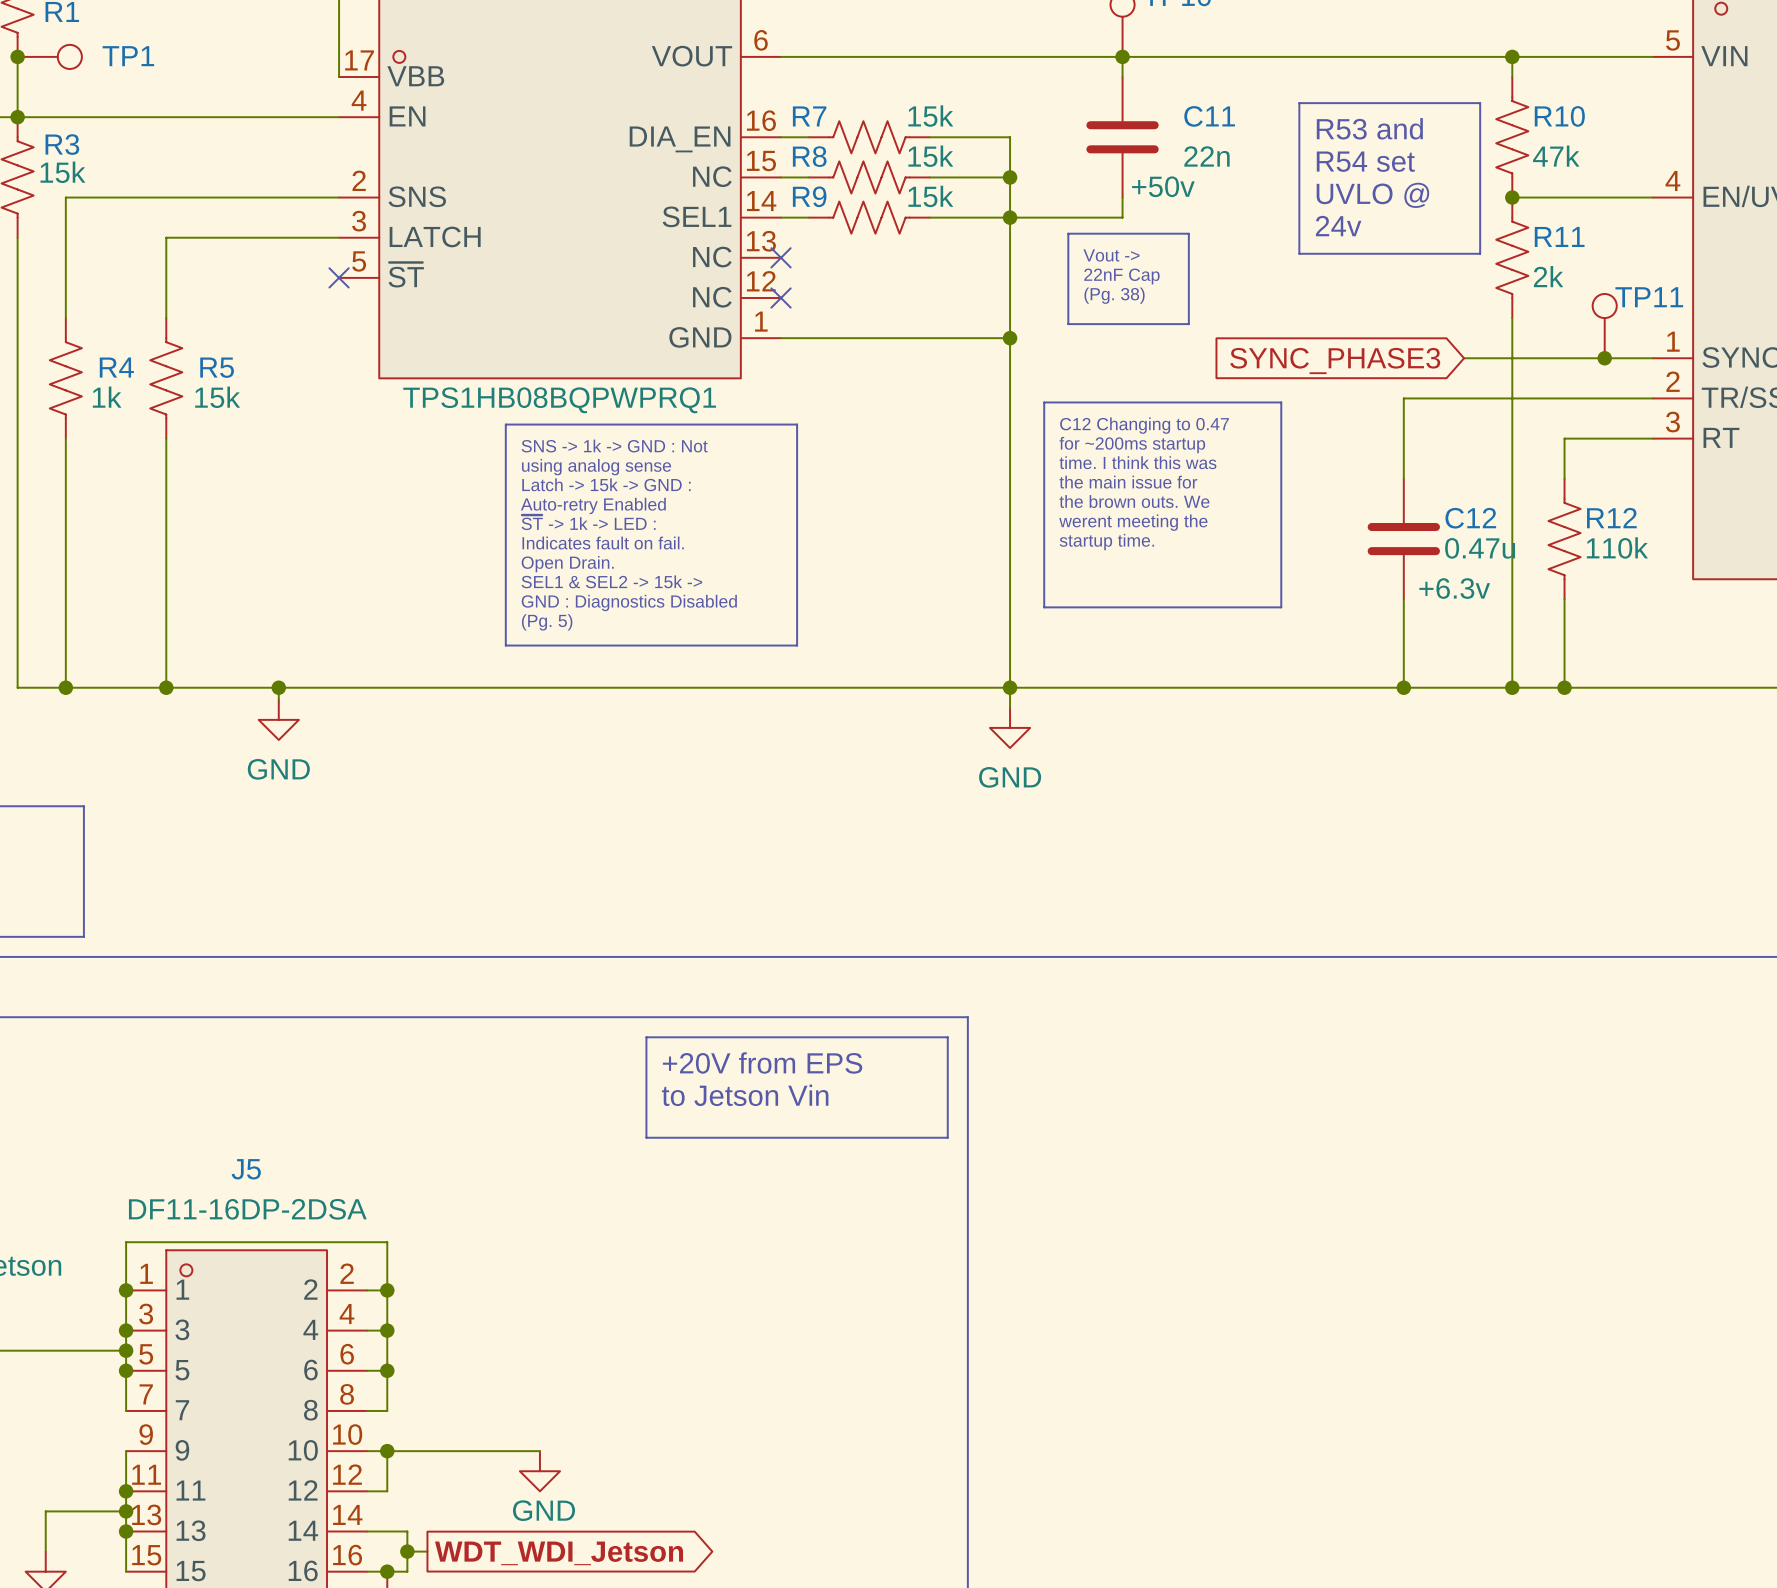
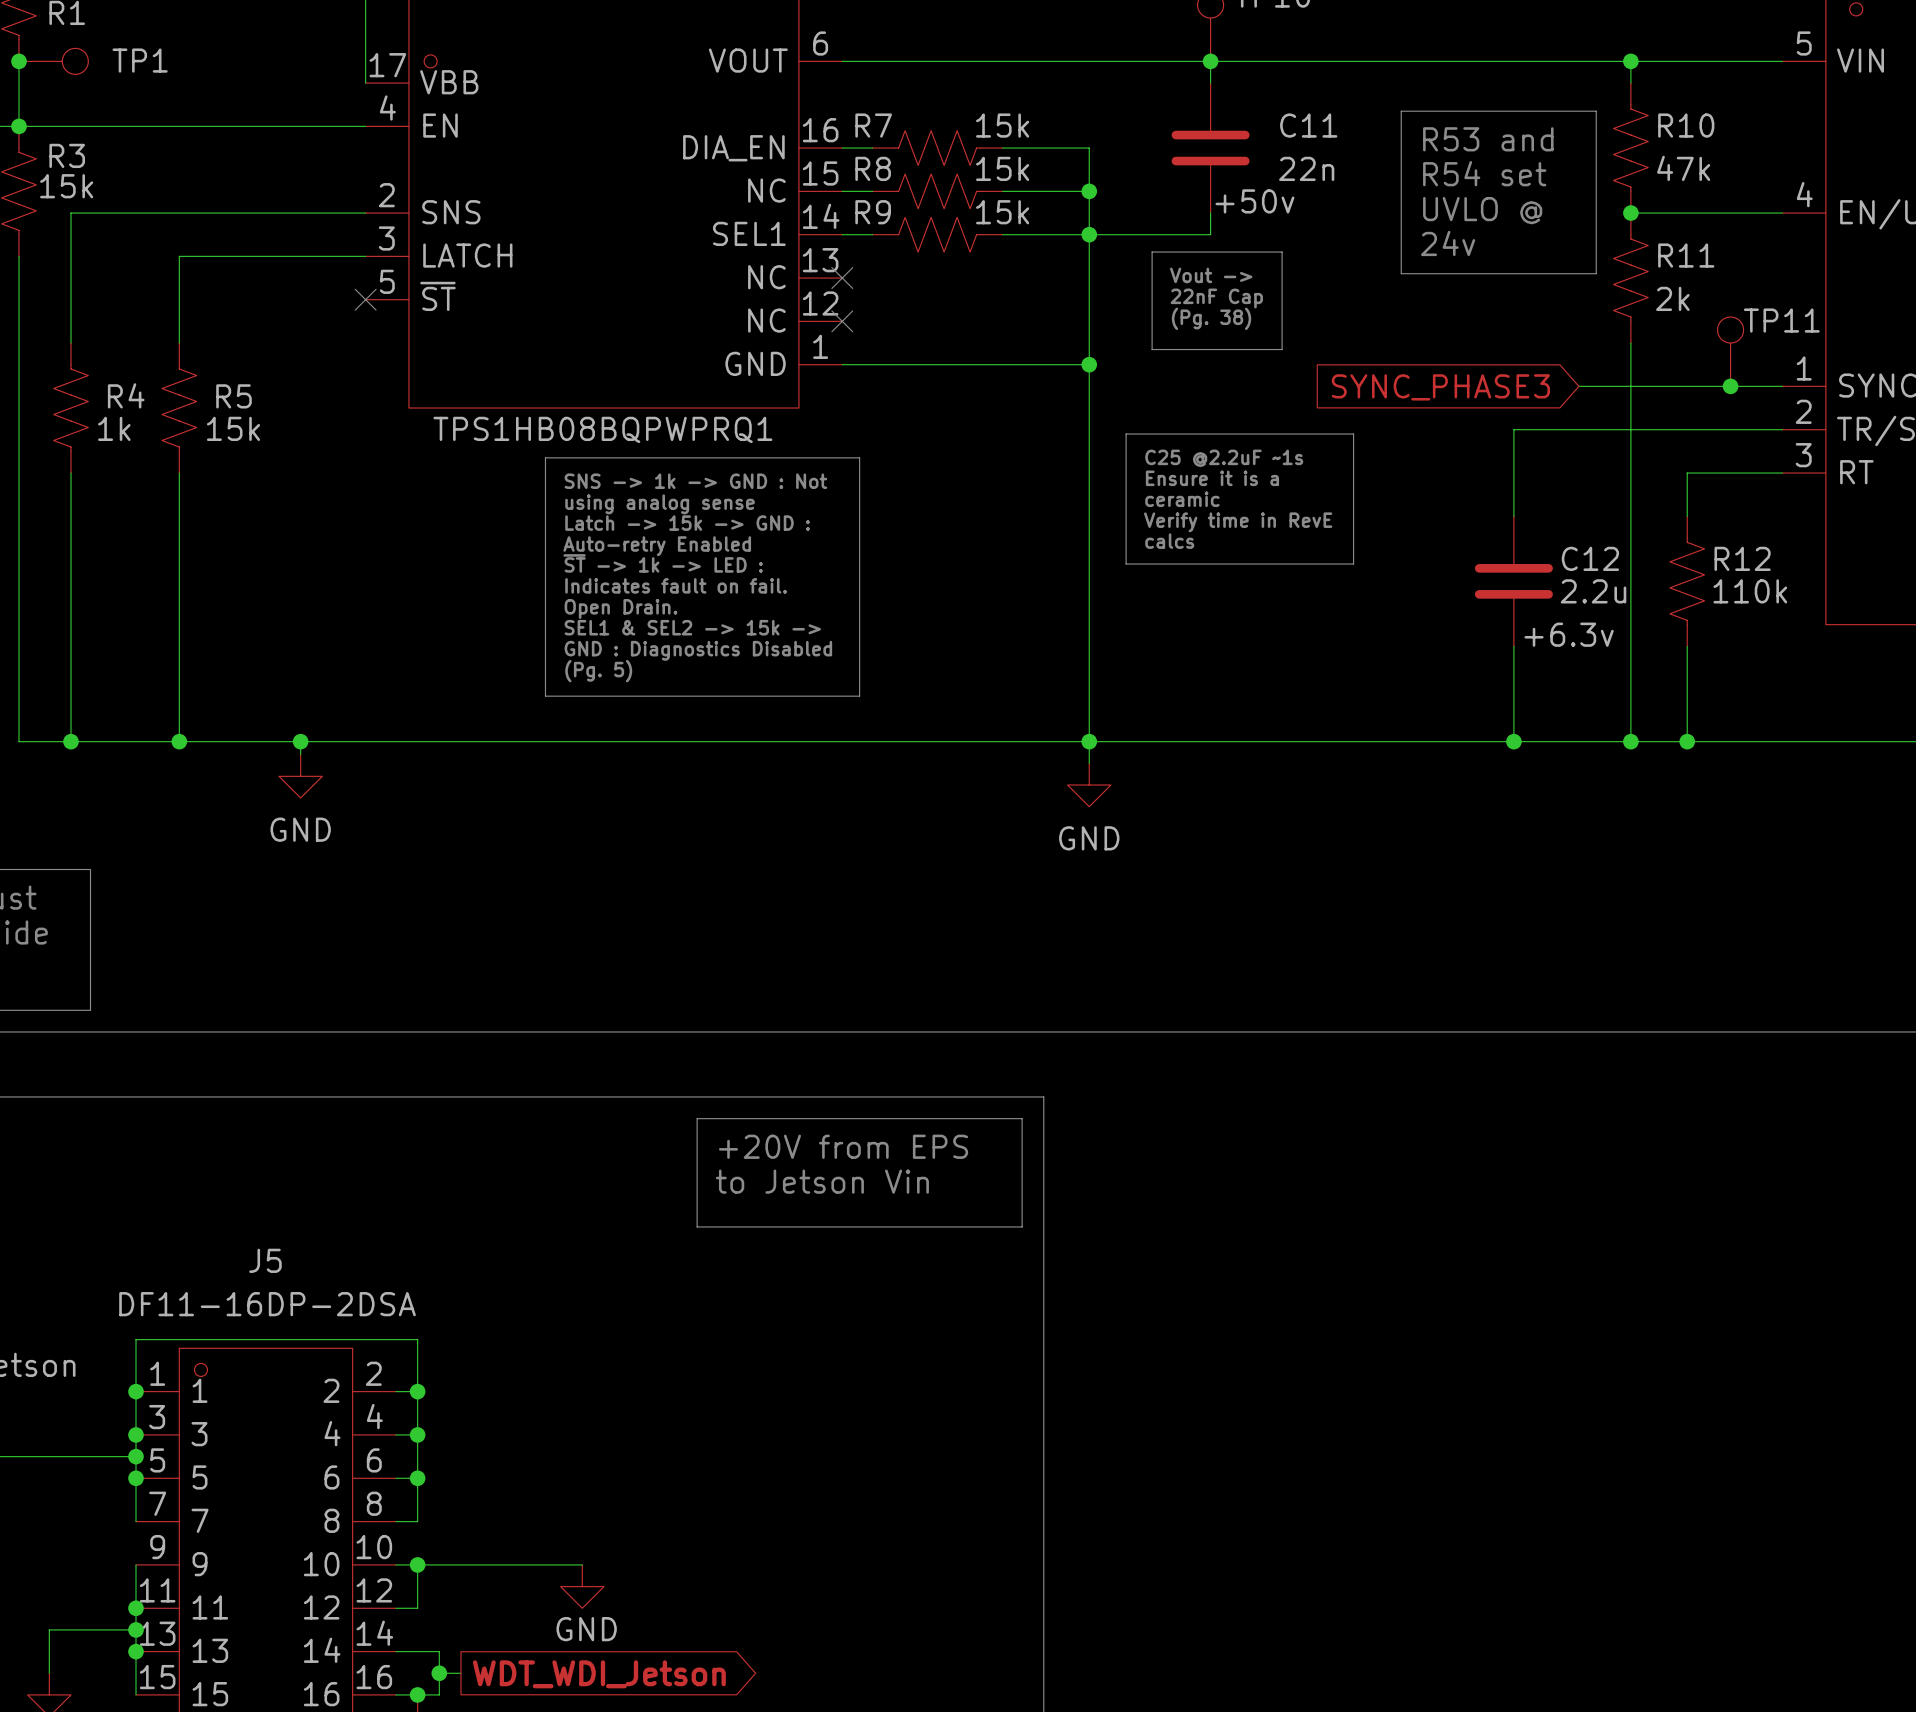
line: (1255, 402) (1281, 402) (1281, 607) (1044, 607) (1044, 523) -> (1353, 434) (1353, 564) (1126, 564)
text: C12 Changing to 0.47 (1144, 425) -> C25 @2.2uF ~1s (1224, 458)
text: for ~200ms startup (1132, 445) -> Ensure it is a (1212, 478)
text: time. I think this was (1137, 462) -> ceramic (1182, 499)
text: the main issue for (1128, 482) -> Verify time in RevE (1238, 522)
text: the brown outs. We (1134, 501) -> calcs (1169, 541)
text: werent meeting the (1133, 522) -> none
text: startup time. (1106, 542) -> none
C12 value: 0.47u (1480, 548) -> 2.2u (1593, 591)

